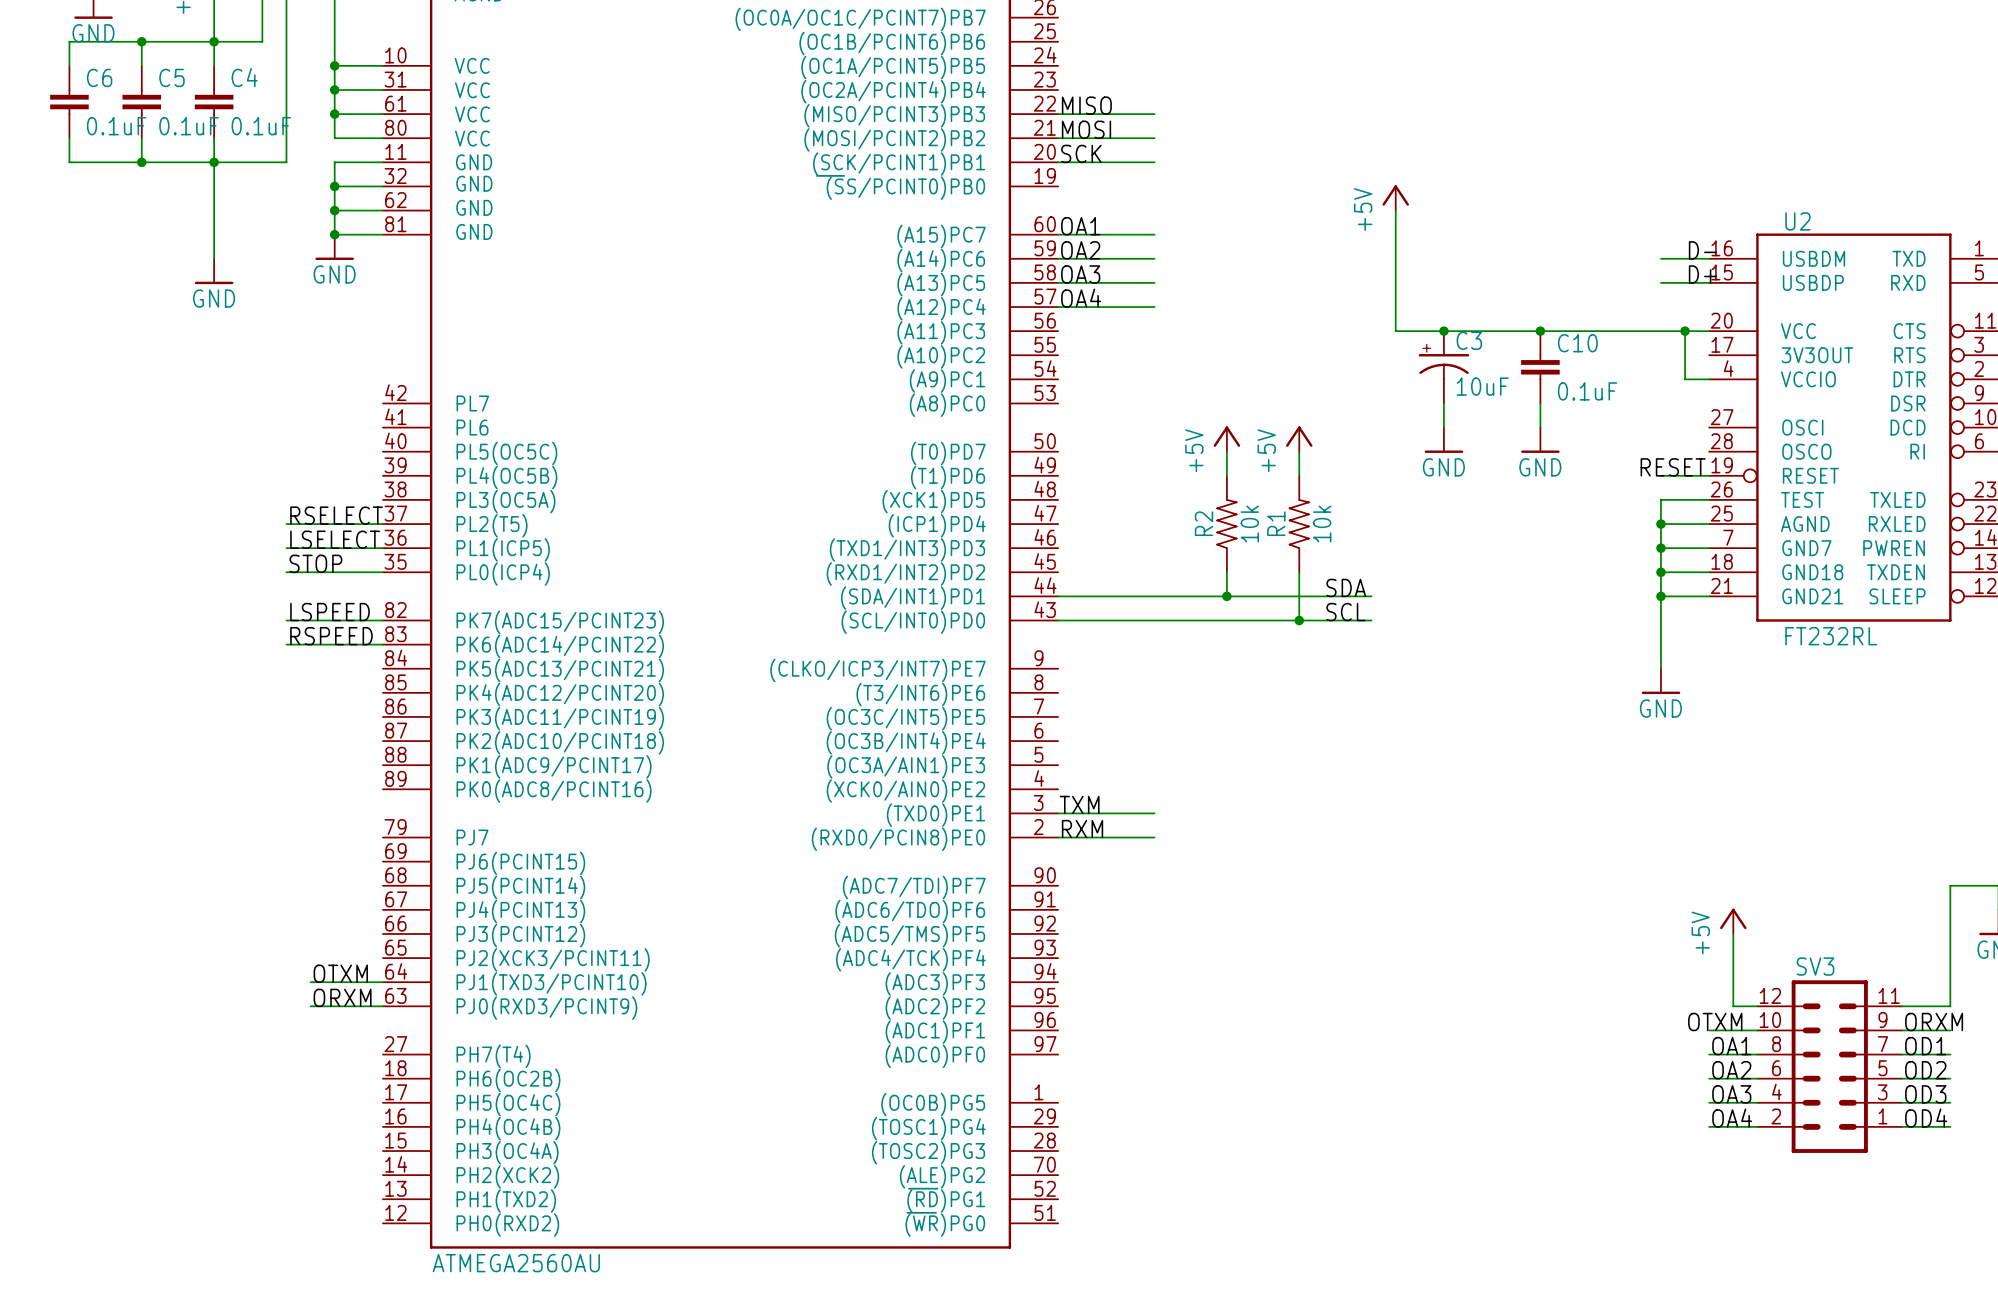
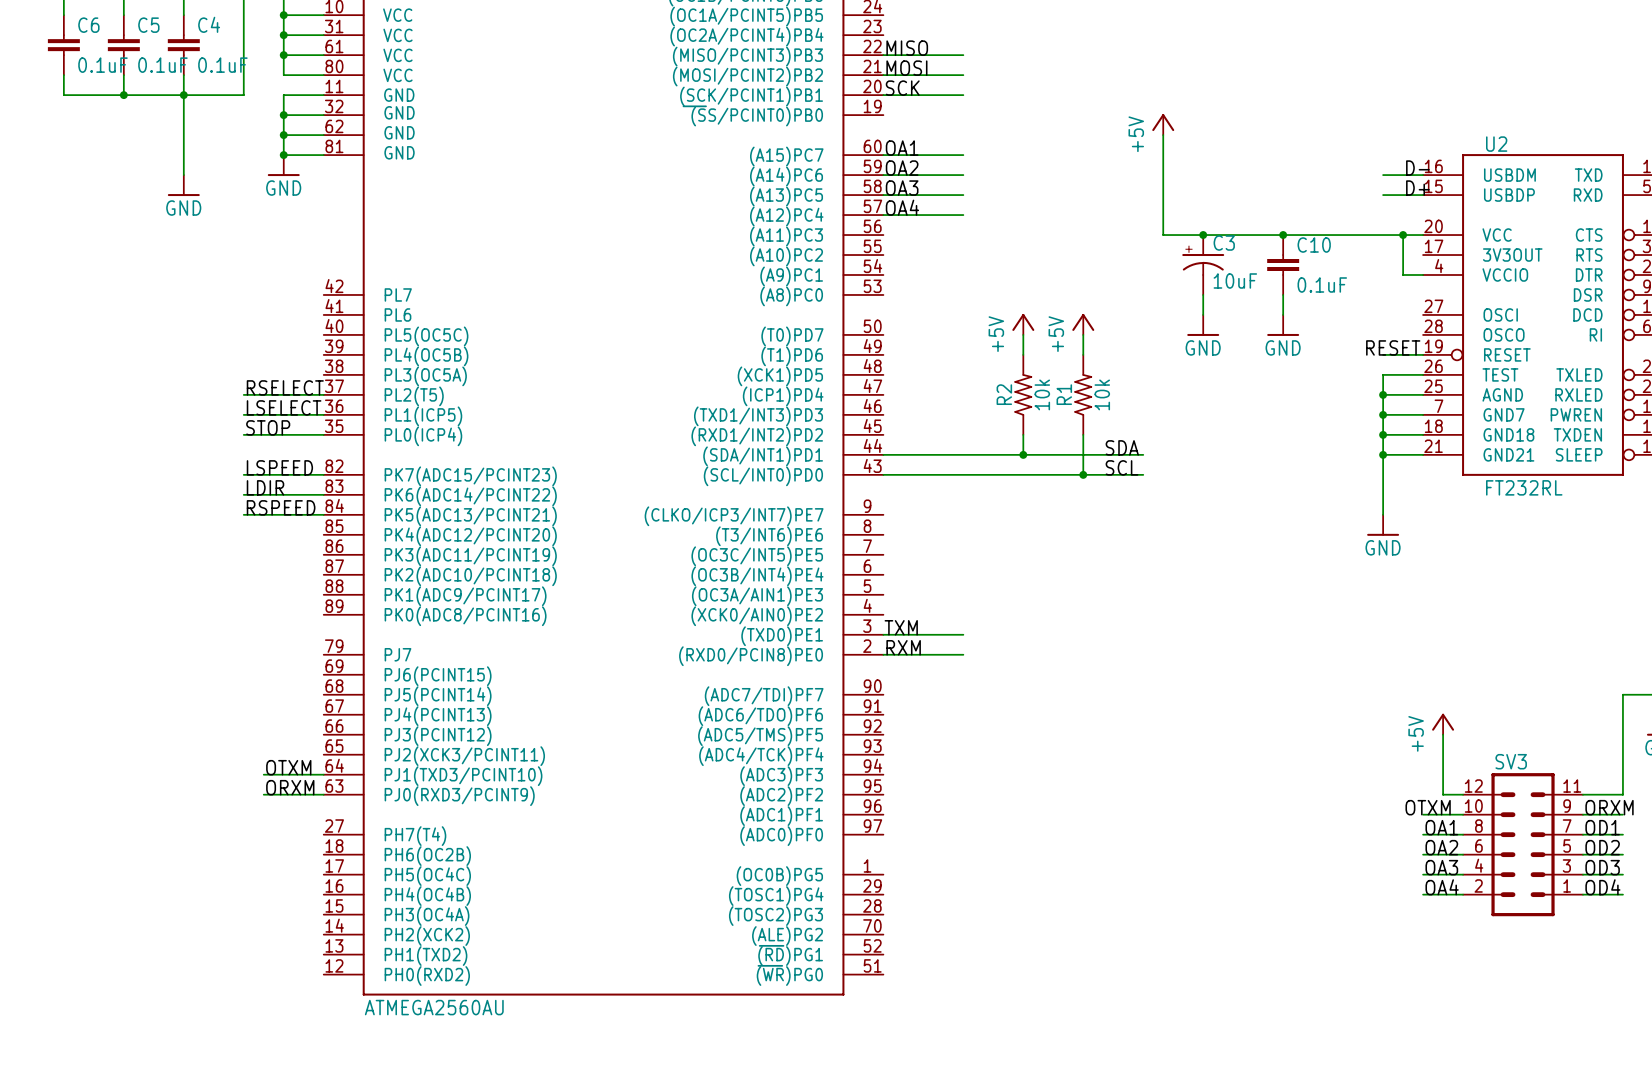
label: RSPEED (331, 636) -> LDIR (265, 487)
label: none -> RSPEED (281, 507)
wire: none -> (243, 514) (323, 514)

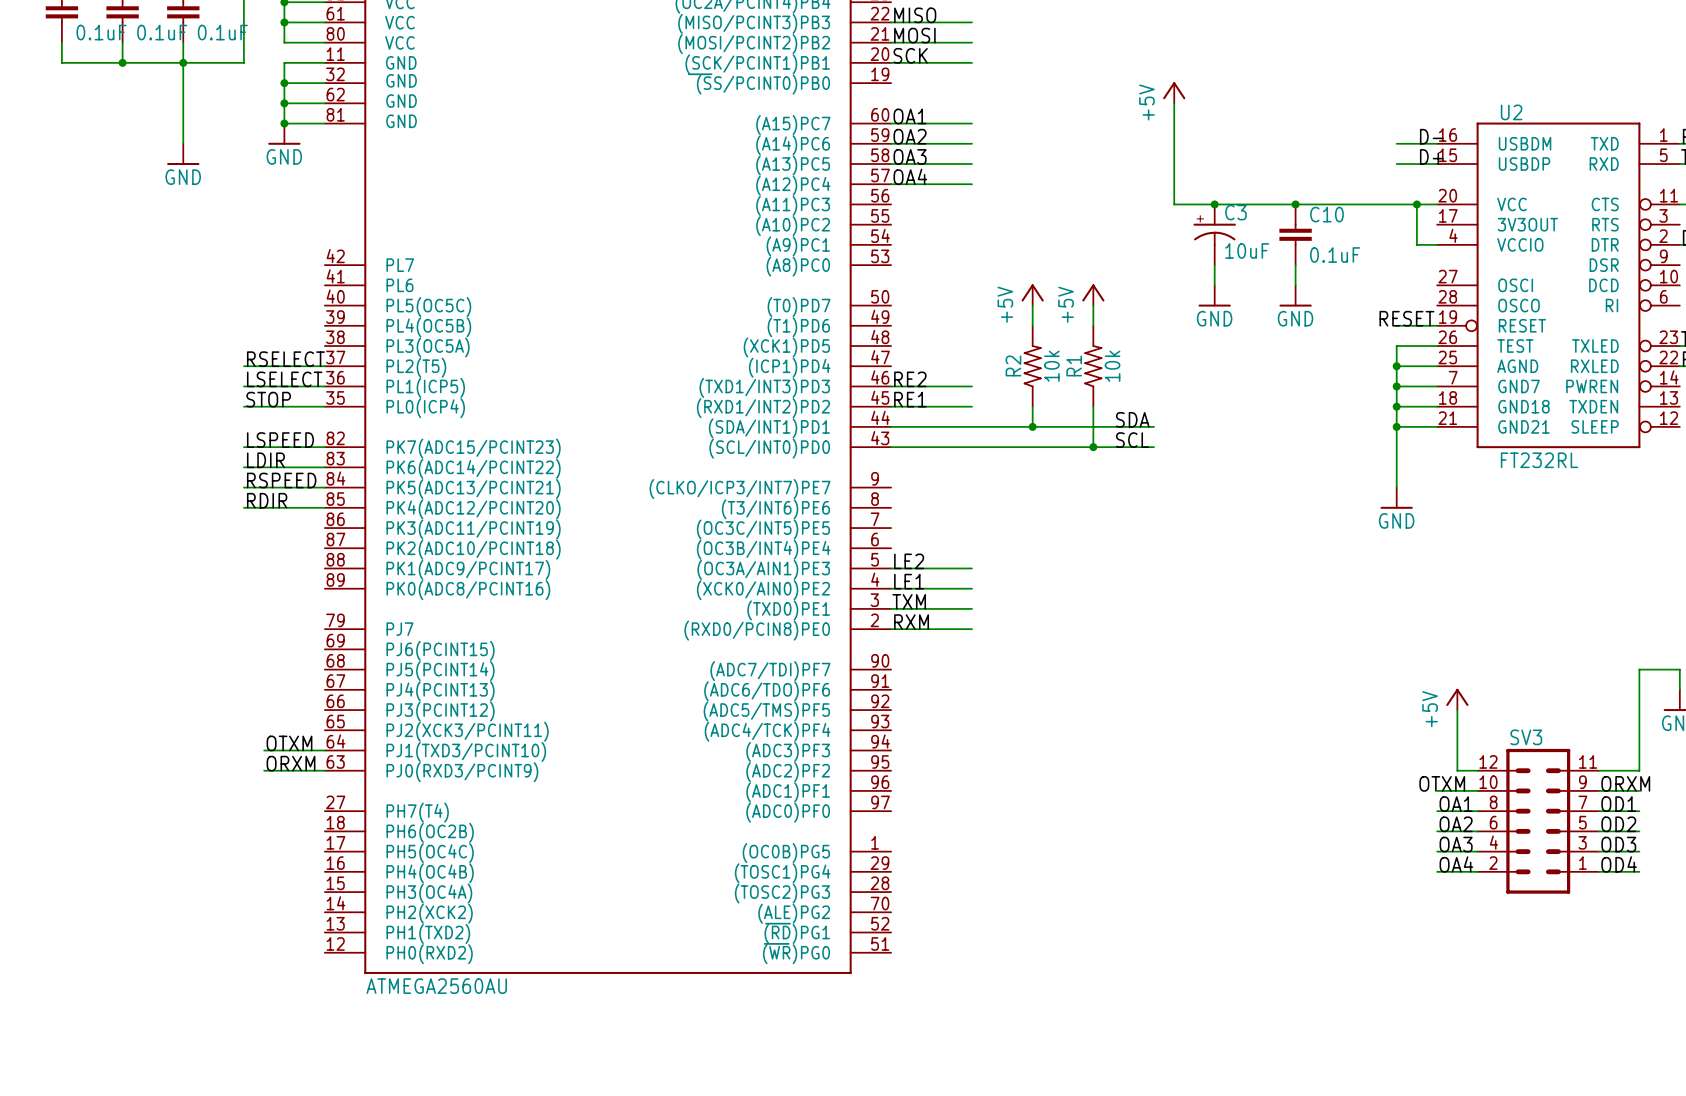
label: none -> RE2 (910, 379)
wire: none -> (891, 386) (972, 386)
label: none -> RE1 (910, 399)
wire: none -> (891, 406) (972, 406)
label: none -> RDIR (267, 500)
wire: none -> (243, 507) (324, 507)
label: none -> LE2 (909, 561)
wire: none -> (891, 568) (972, 568)
label: none -> LE1 (909, 581)
wire: none -> (891, 588) (972, 588)

